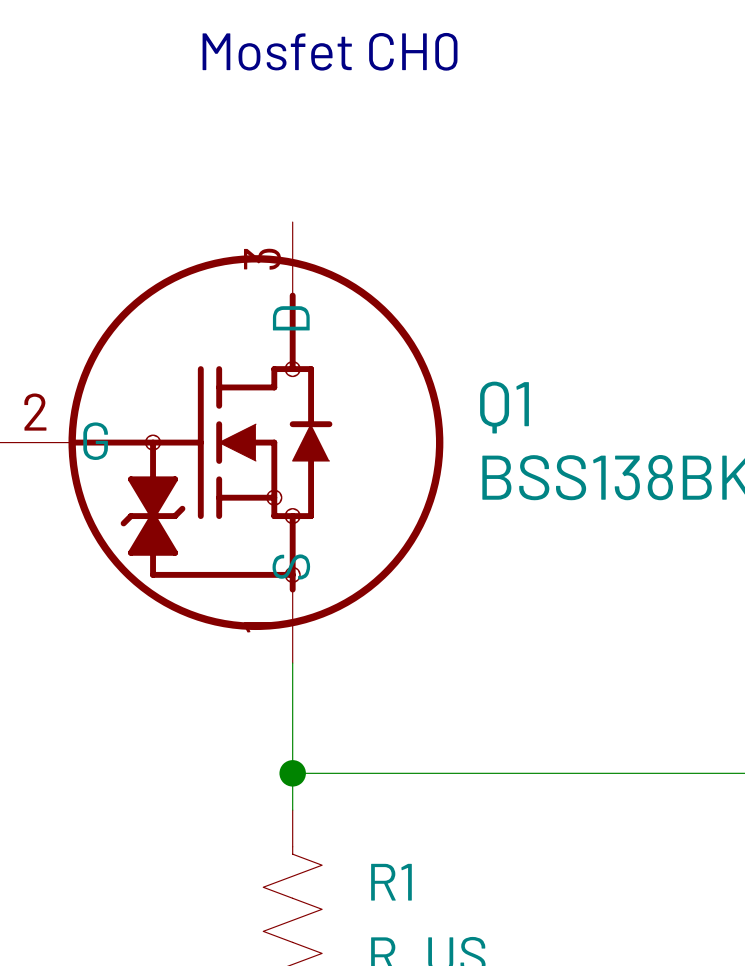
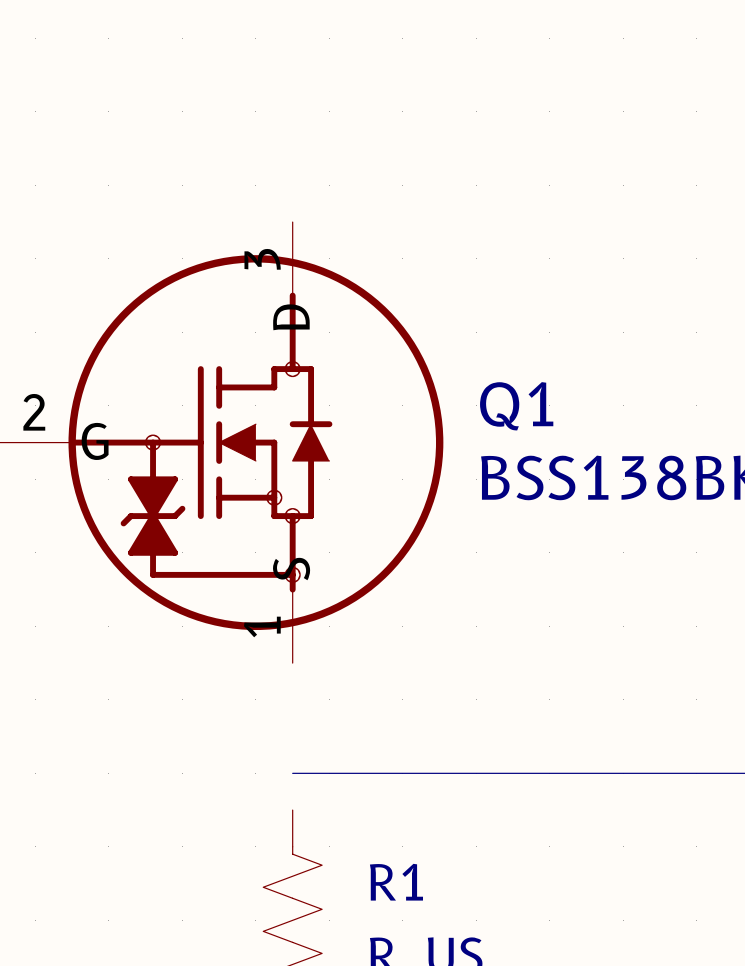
text: Mosfet CH0 (330, 51) -> none
wire: (292, 663) (292, 810) -> none
junction: (292, 773) -> none

